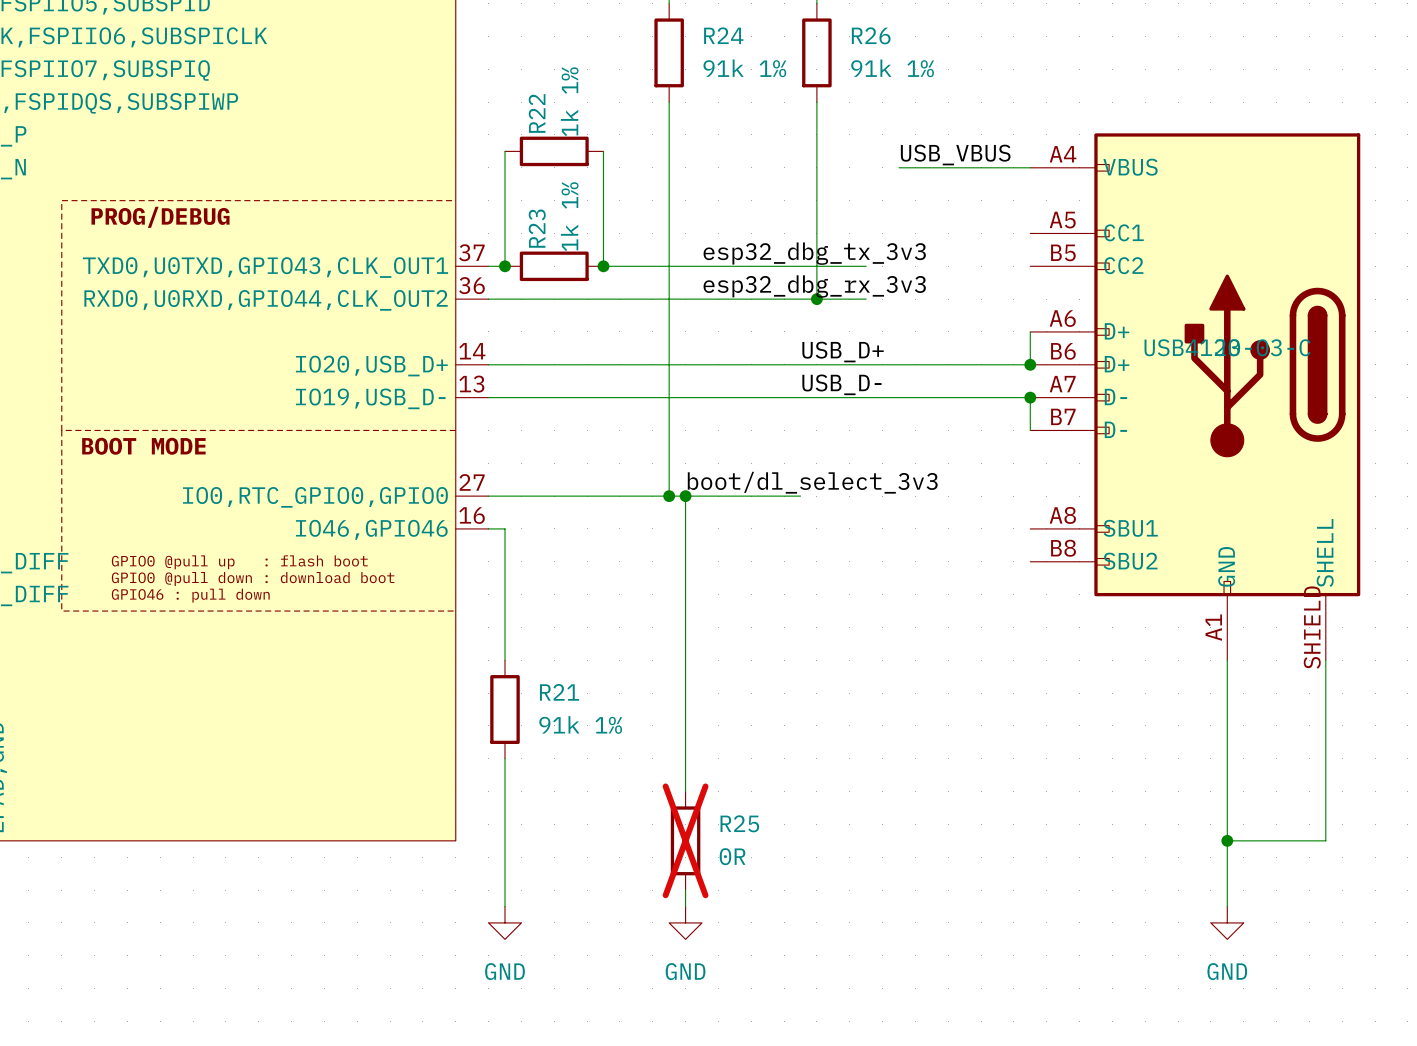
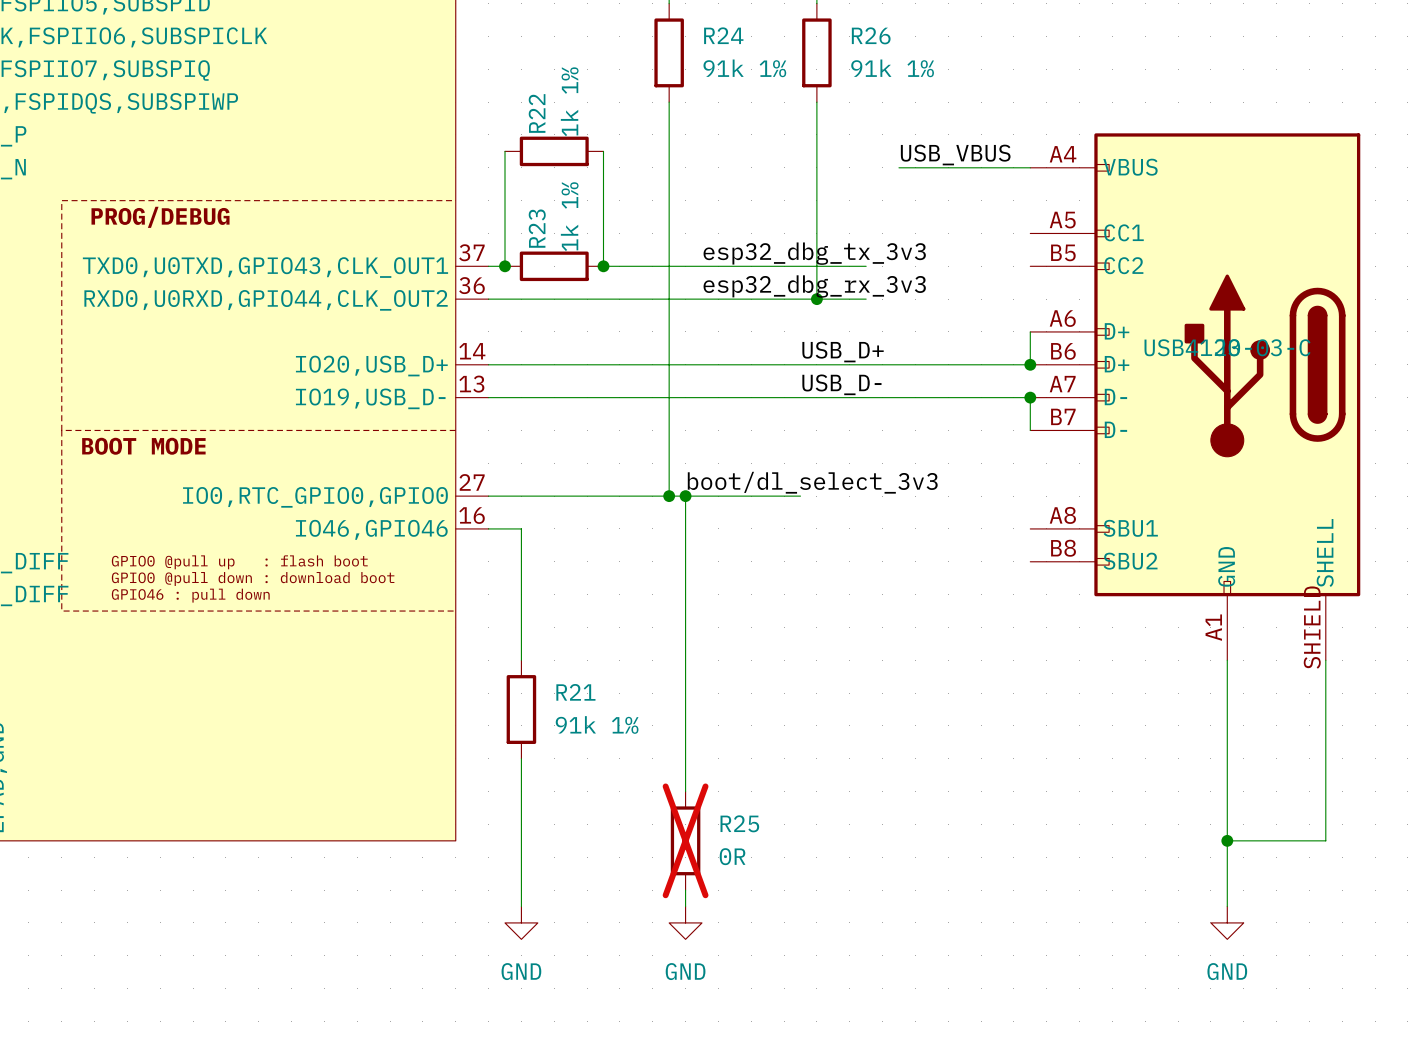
wire: (505, 528) (505, 660) -> (505, 528) (521, 528) (521, 660)
R21 position: (505, 709) -> (521, 709)
wire: (505, 758) (505, 906) -> (521, 758) (521, 906)
power symbol position: GND (505, 922) -> GND (521, 922)

